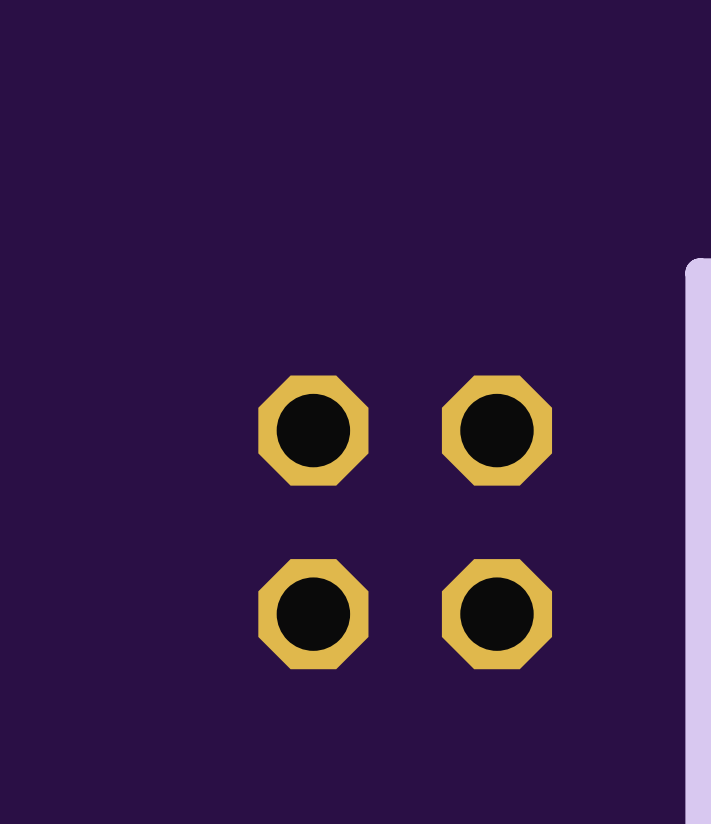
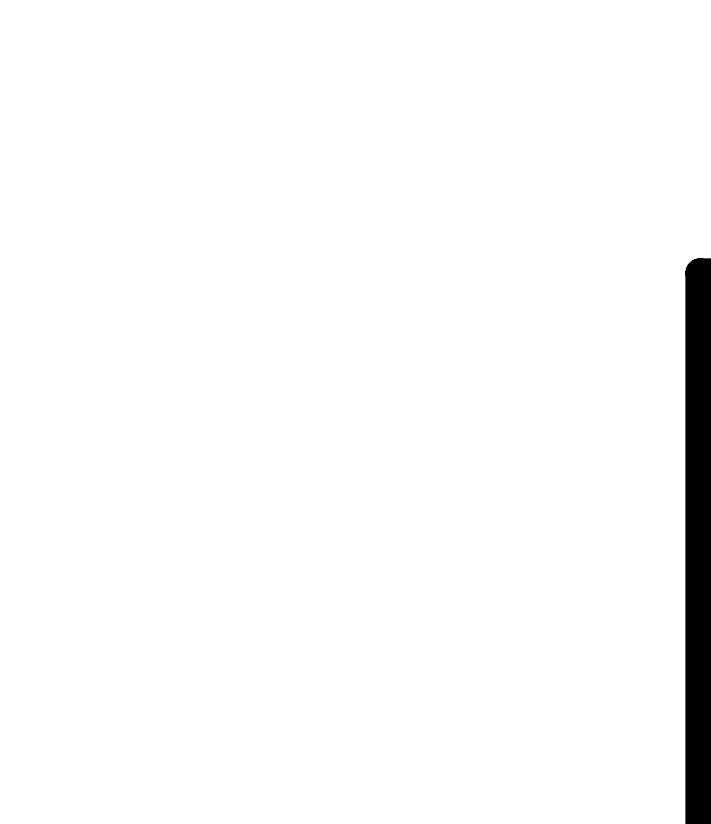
part: (405, 522) -> none

